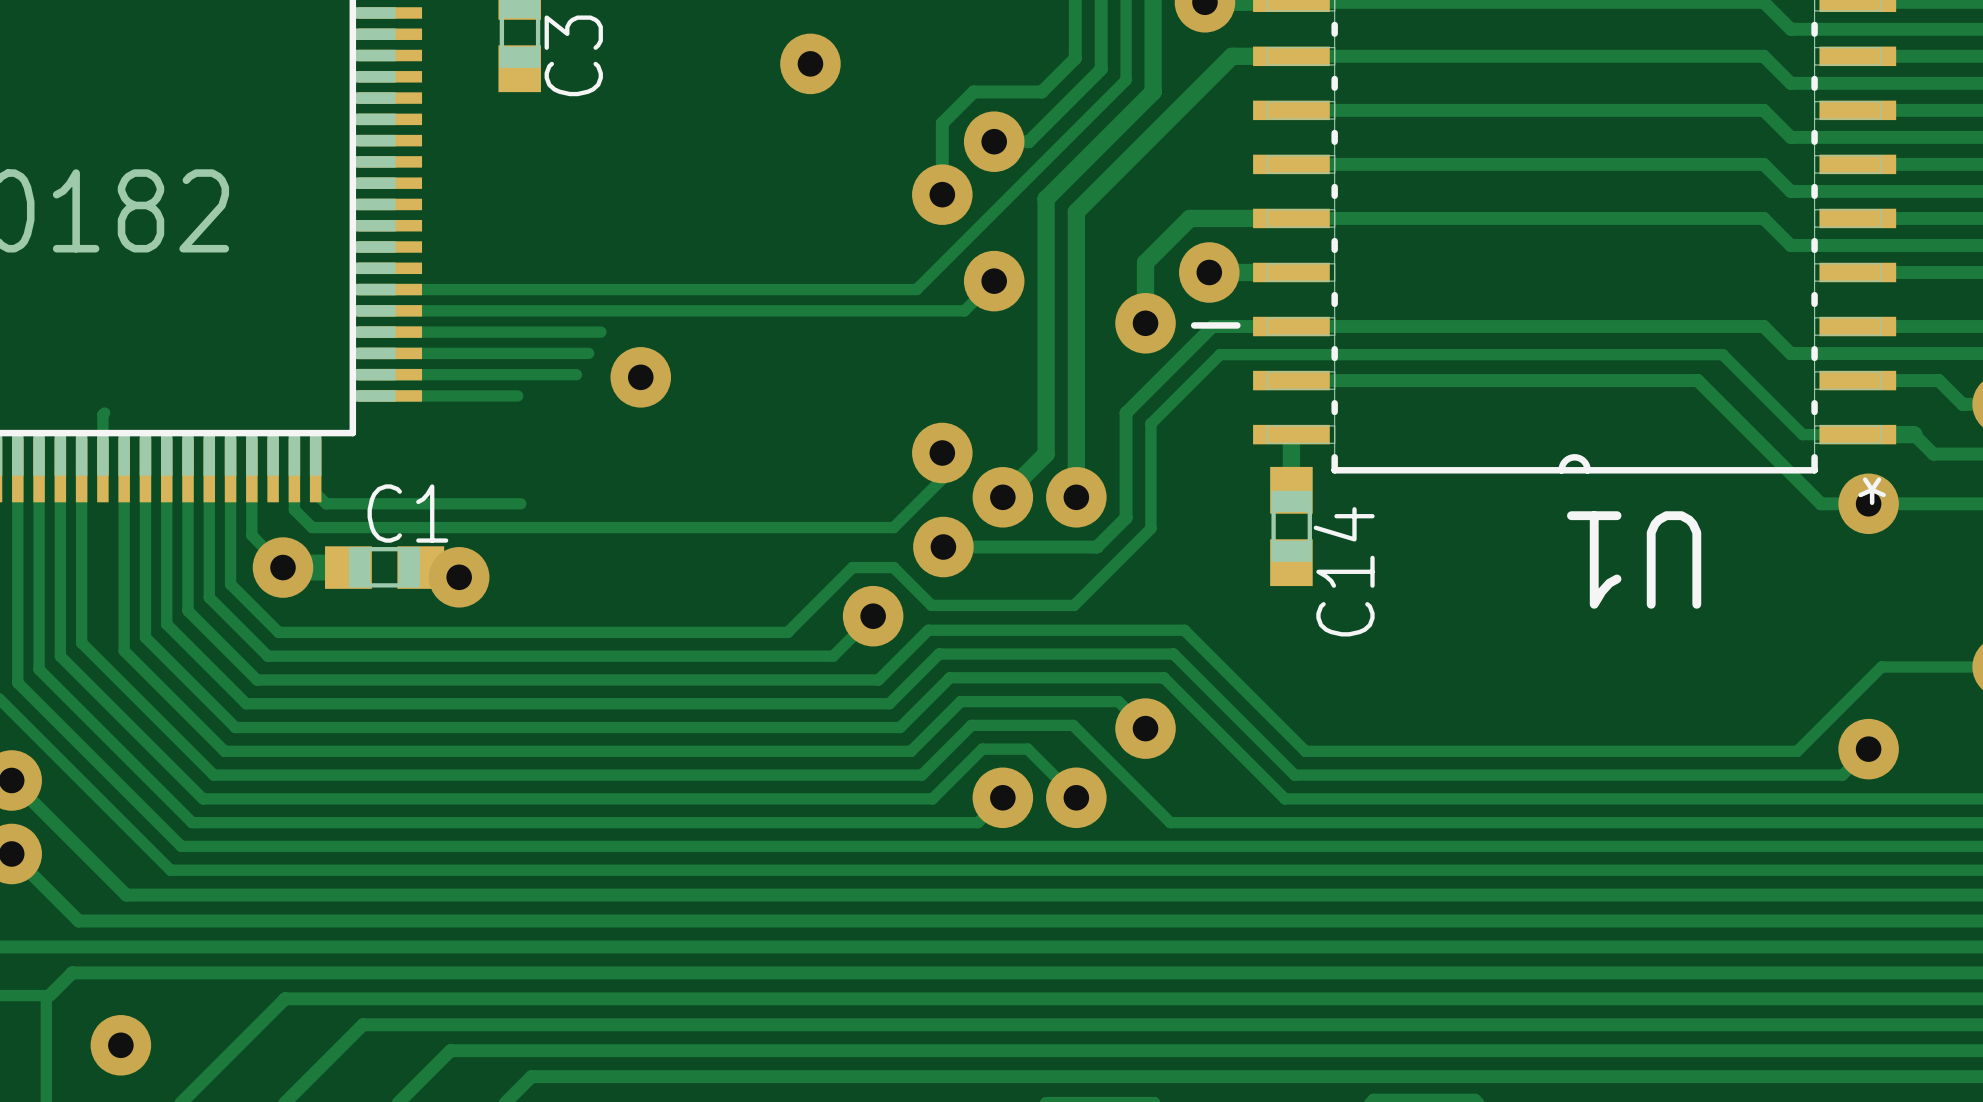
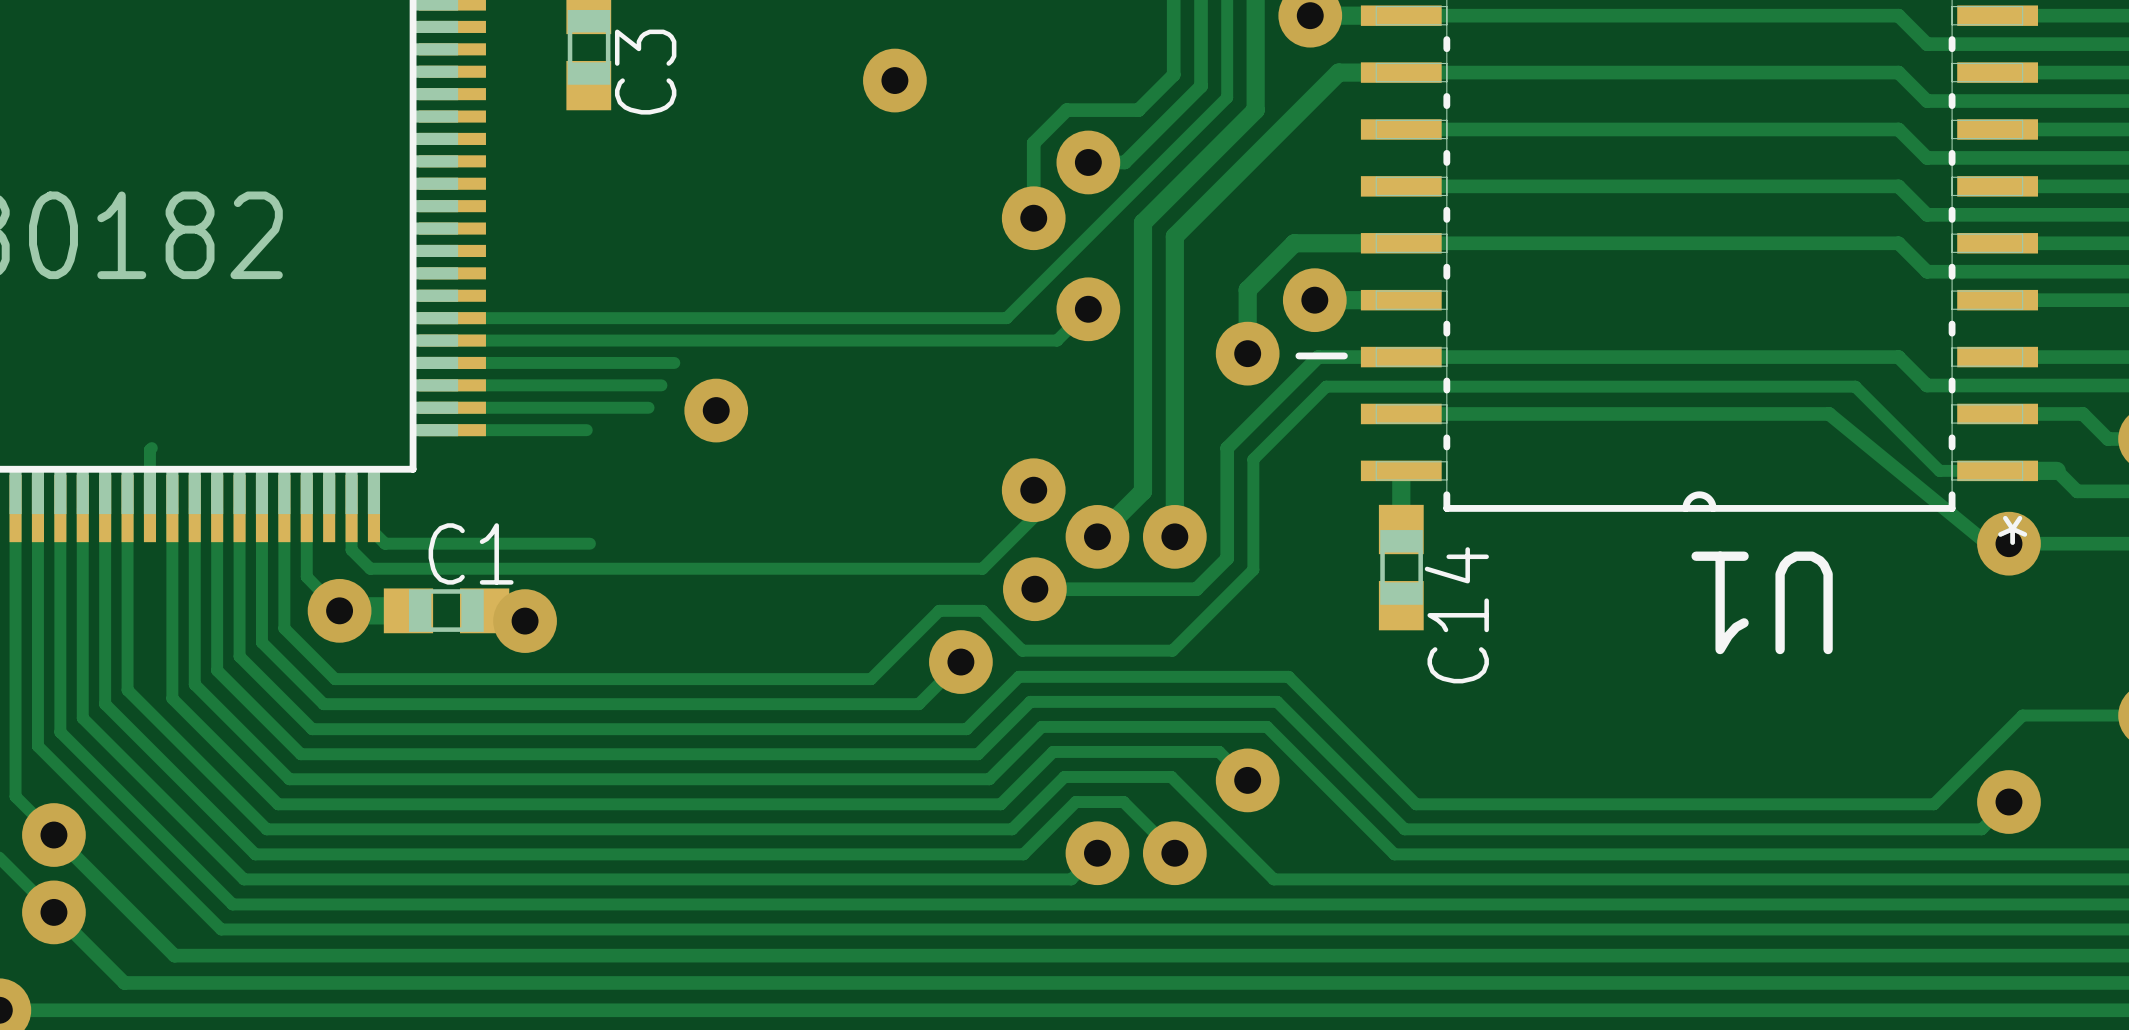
track: (1697, 380) (1821, 503) (1848, 503) -> (1829, 413) (1987, 543)

